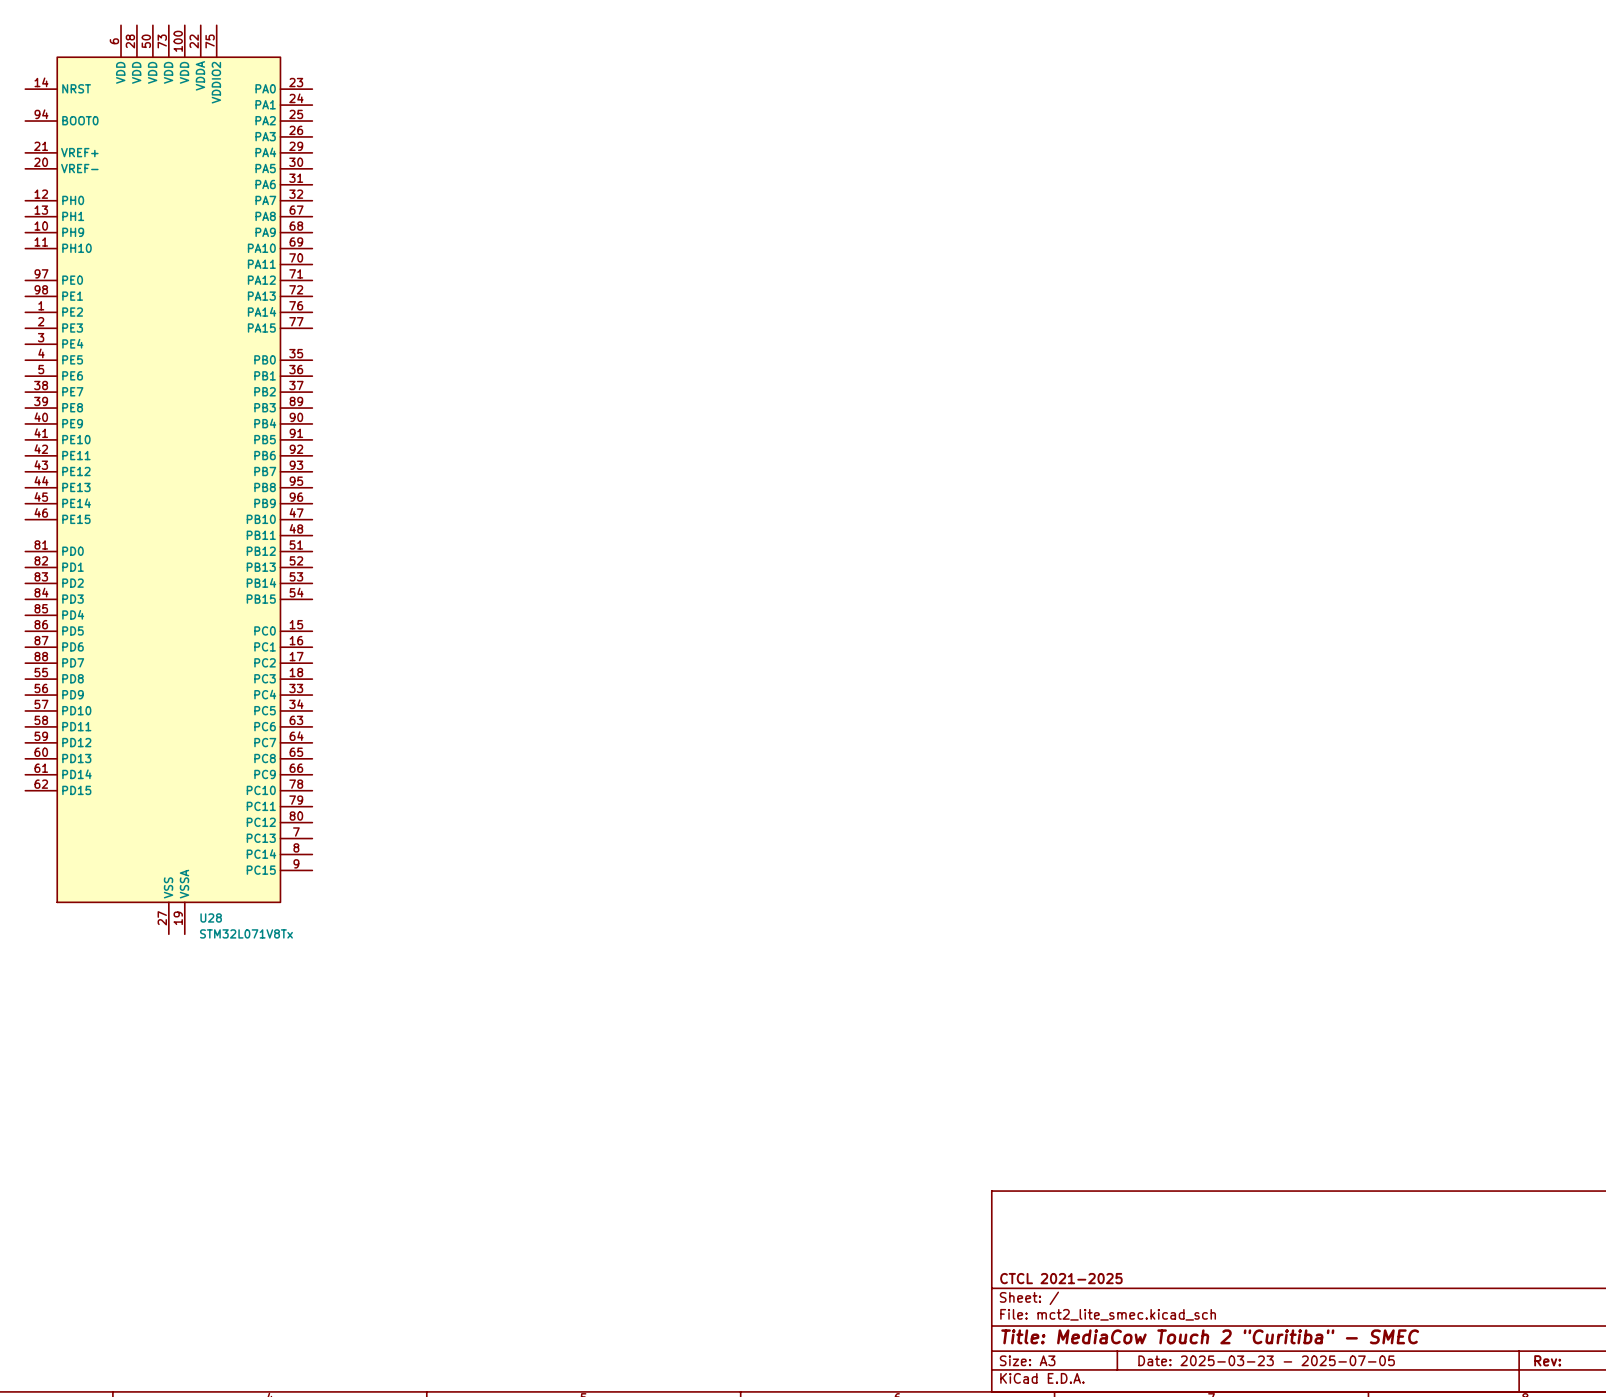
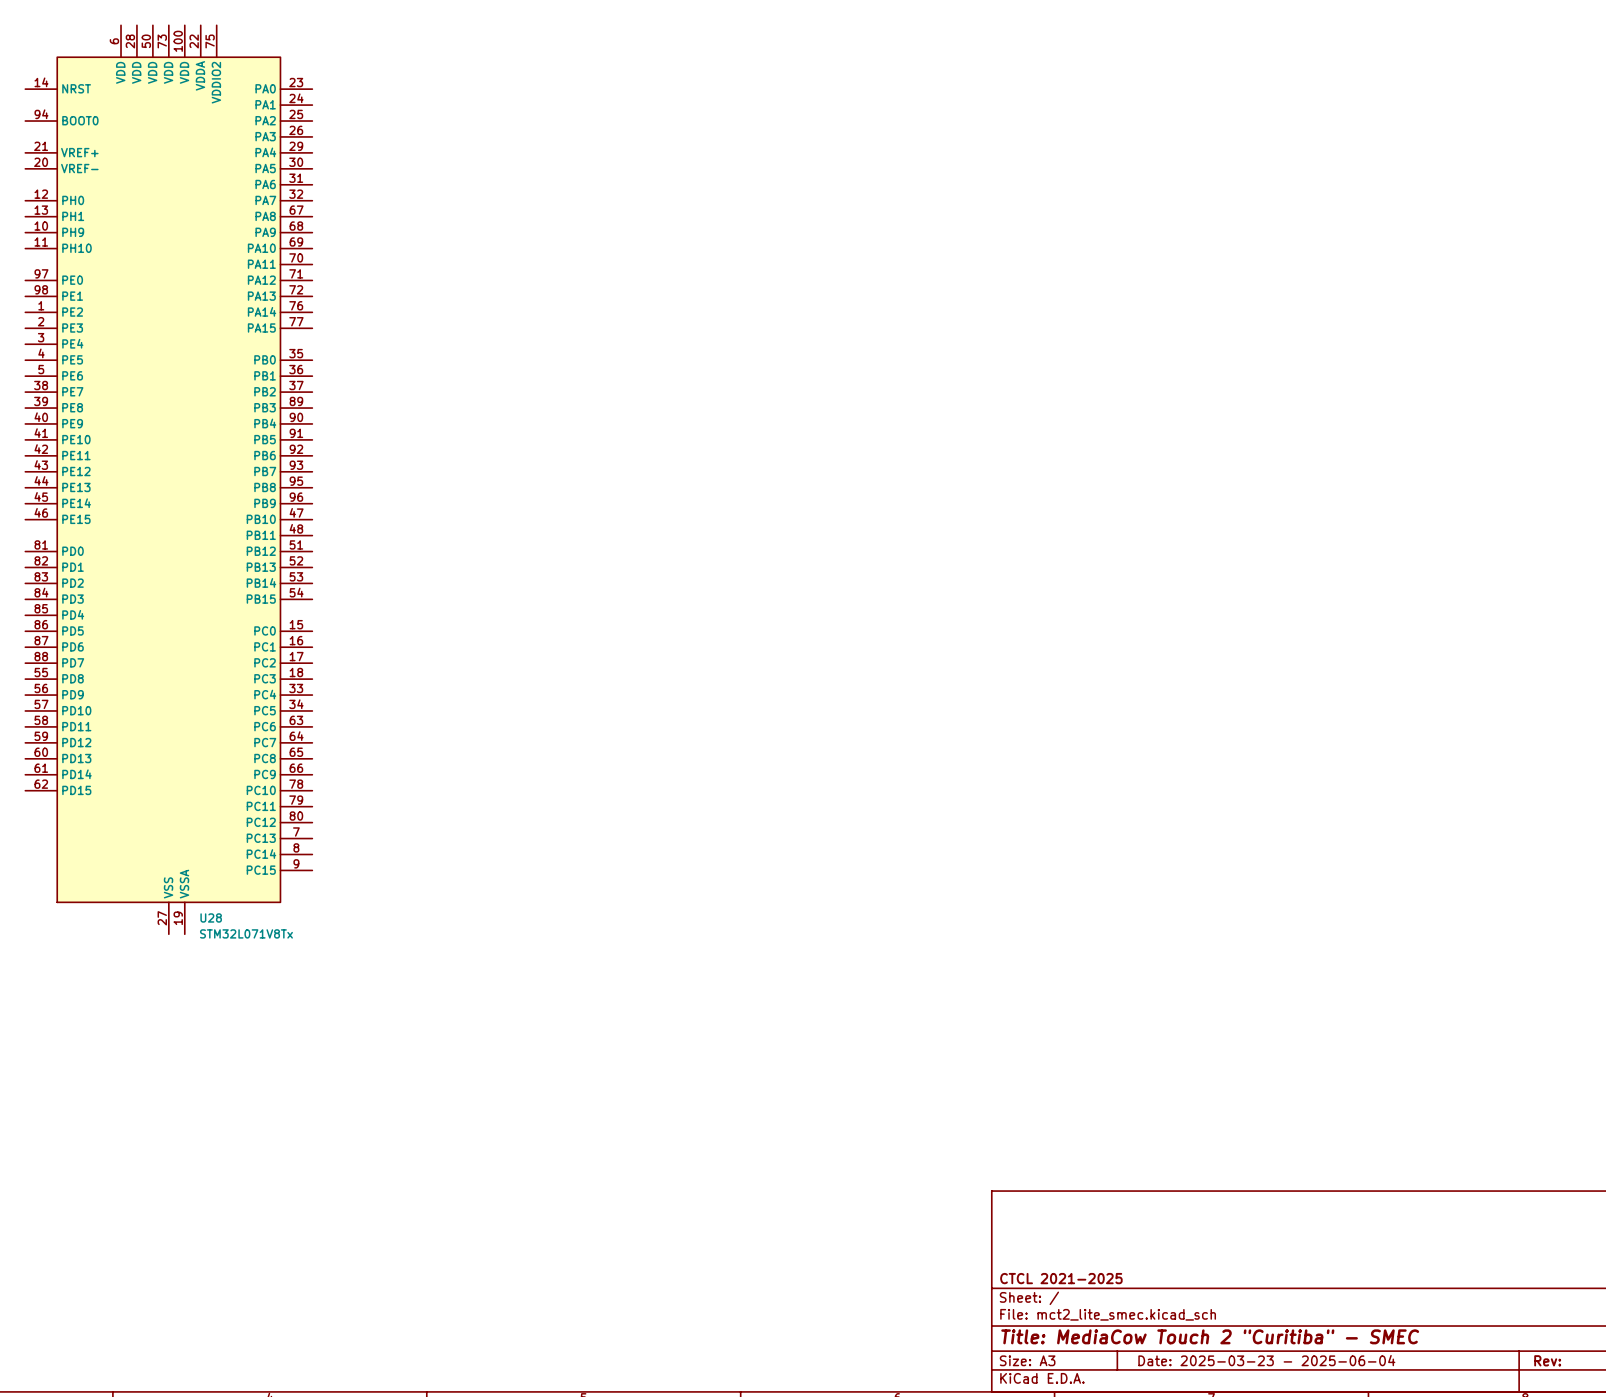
title block: Date: 2025-03-23 - 2025-07-05 (1266, 1360) -> Date: 2025-03-23 - 2025-06-04 (1266, 1360)

